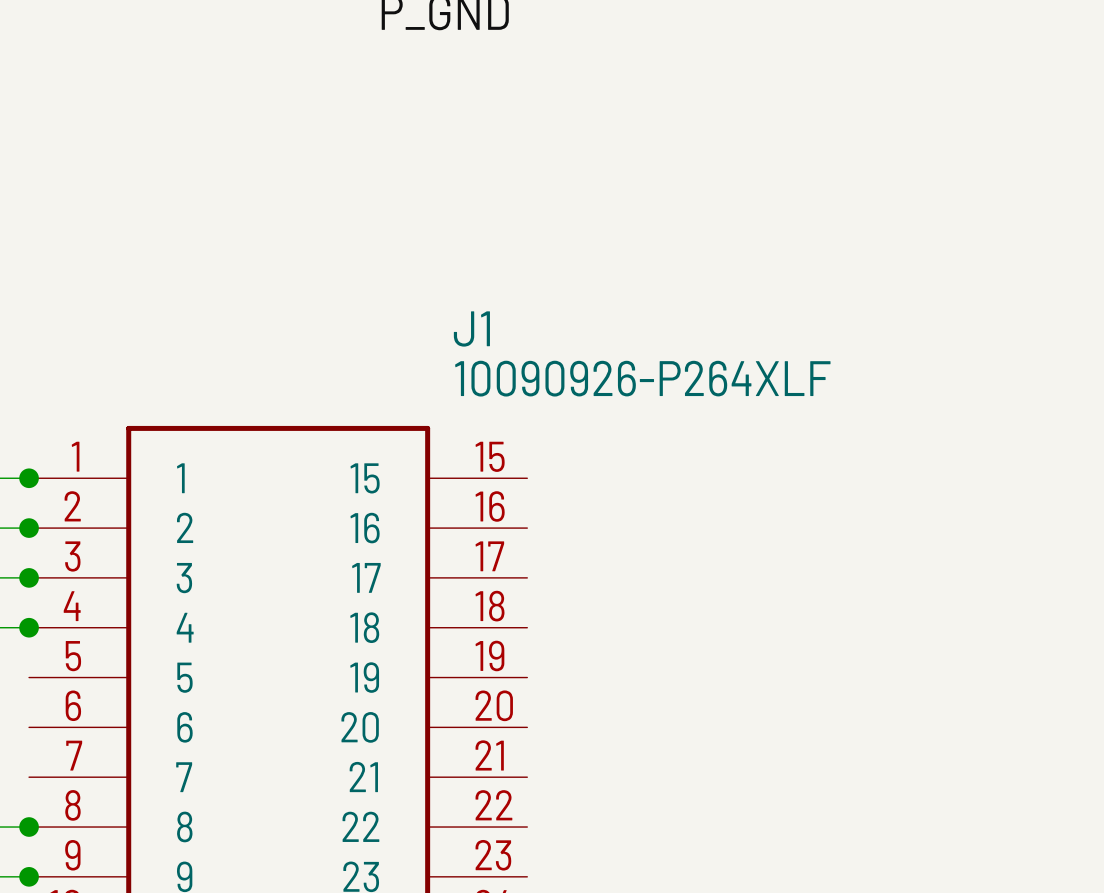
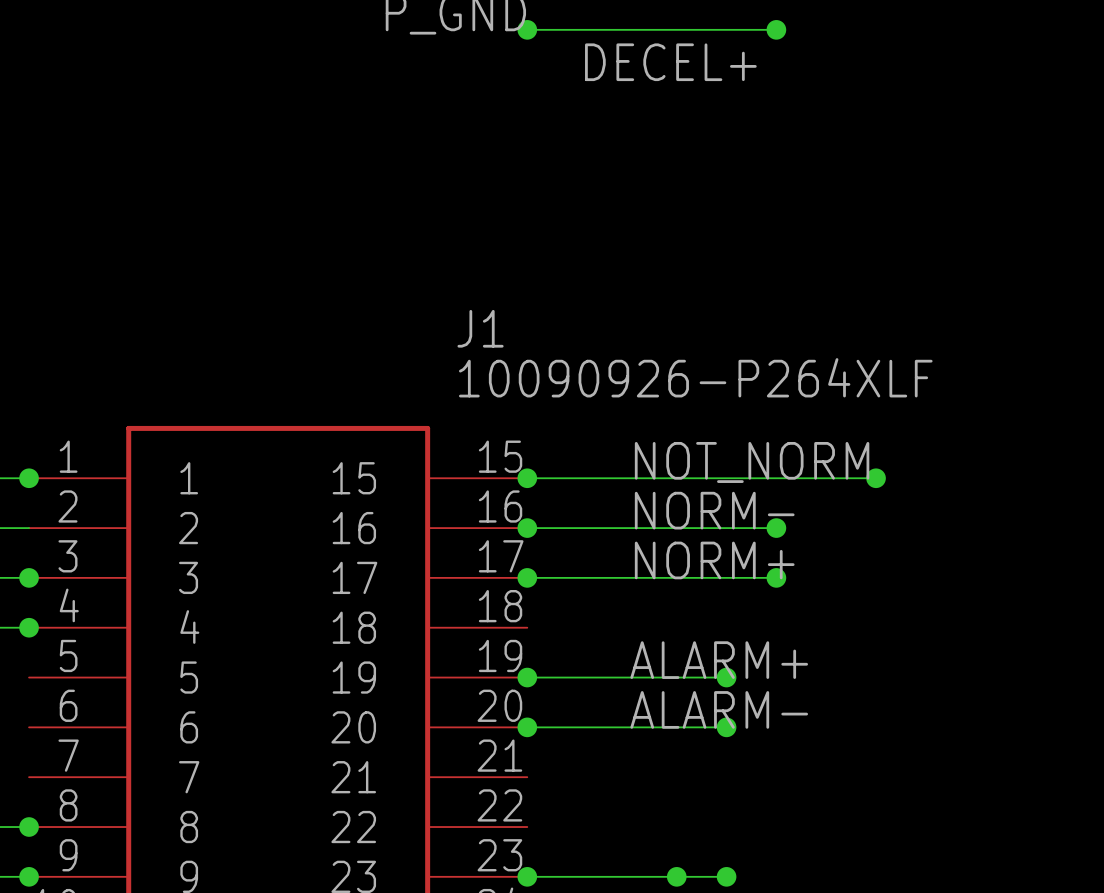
wire: none -> (527, 29) (776, 29)
junction: none -> (527, 29)
junction: none -> (776, 29)
label: none -> DECEL+ (670, 62)
label: none -> NOT_NORM (752, 462)
wire: none -> (527, 478) (876, 478)
junction: none -> (527, 478)
junction: none -> (876, 478)
label: none -> NORM- (714, 510)
junction: (29, 528) -> none
wire: none -> (527, 528) (776, 528)
junction: none -> (527, 528)
junction: none -> (776, 528)
label: none -> NORM+ (714, 560)
wire: none -> (527, 577) (776, 577)
junction: none -> (527, 577)
junction: none -> (776, 577)
label: none -> ALARM+ (719, 660)
wire: none -> (527, 677) (726, 677)
junction: none -> (527, 677)
junction: none -> (726, 677)
label: none -> ALARM- (719, 709)
wire: none -> (527, 727) (726, 727)
junction: none -> (527, 727)
junction: none -> (726, 727)
wire: none -> (527, 876) (726, 876)
junction: none -> (527, 876)
junction: none -> (676, 876)
junction: none -> (726, 876)

